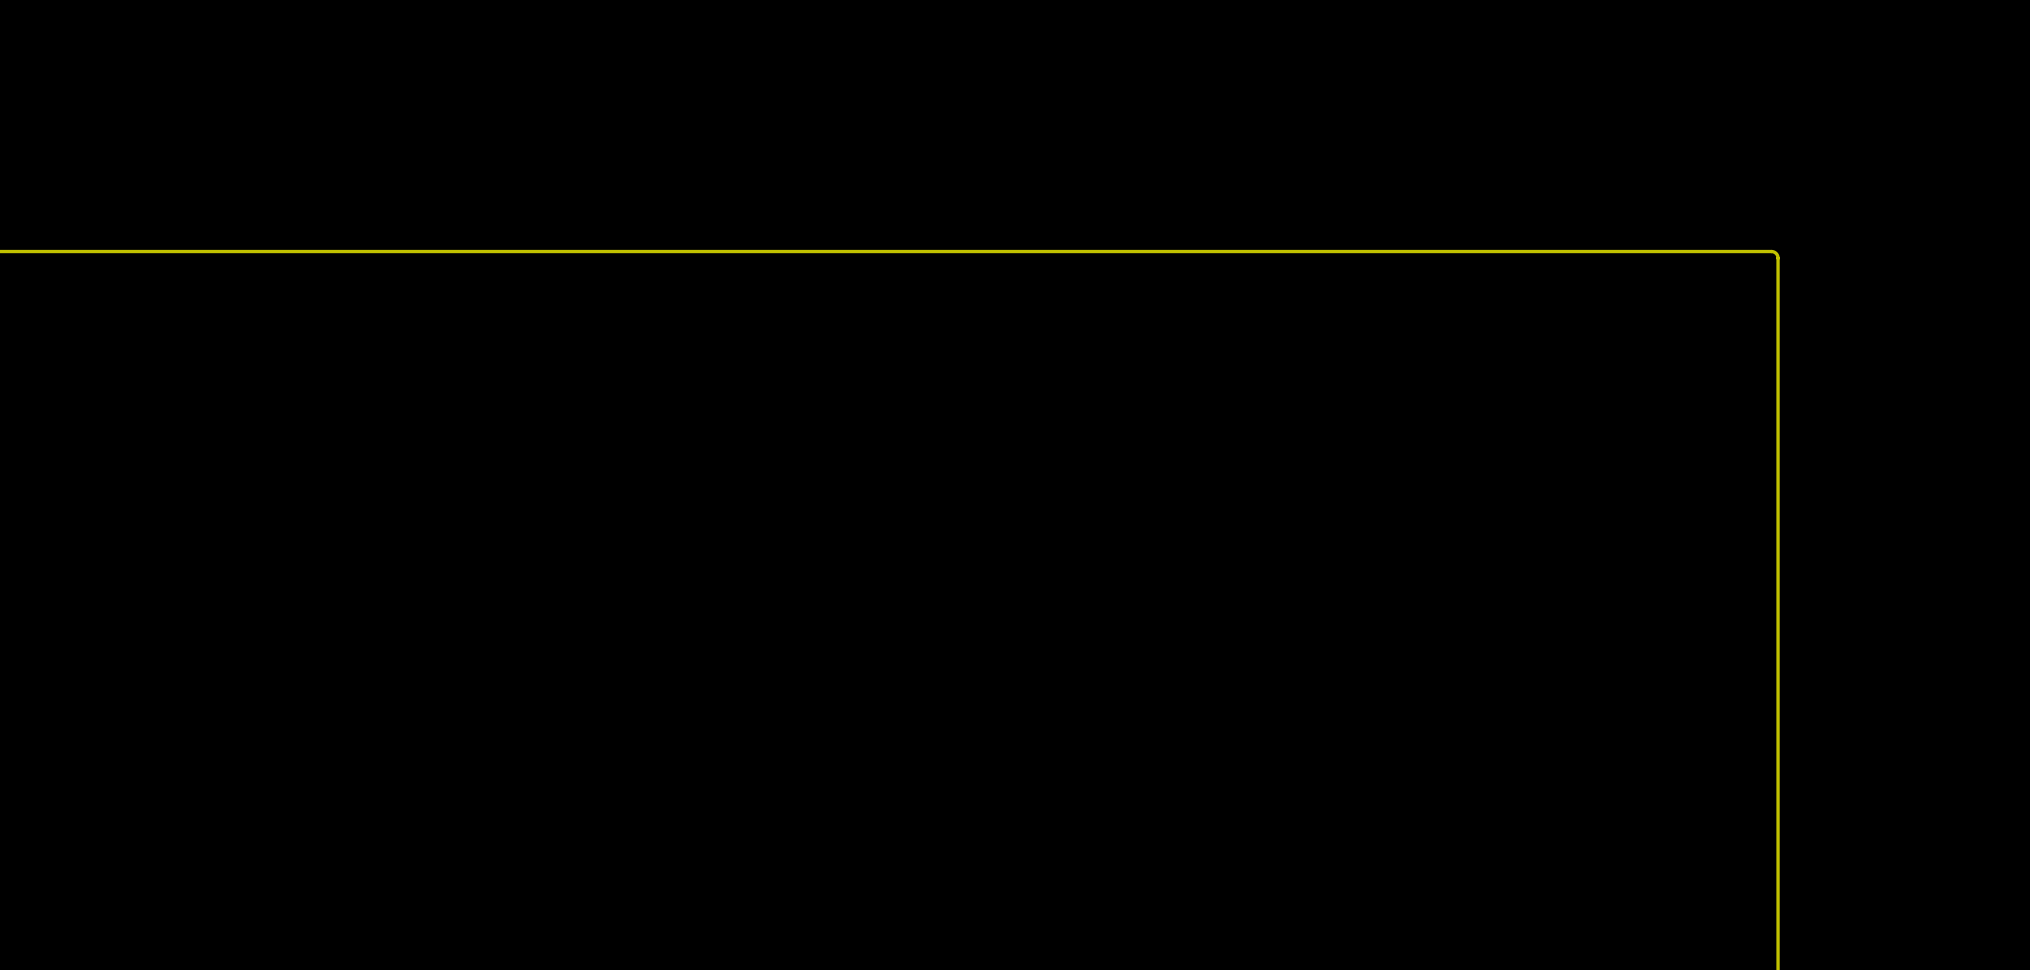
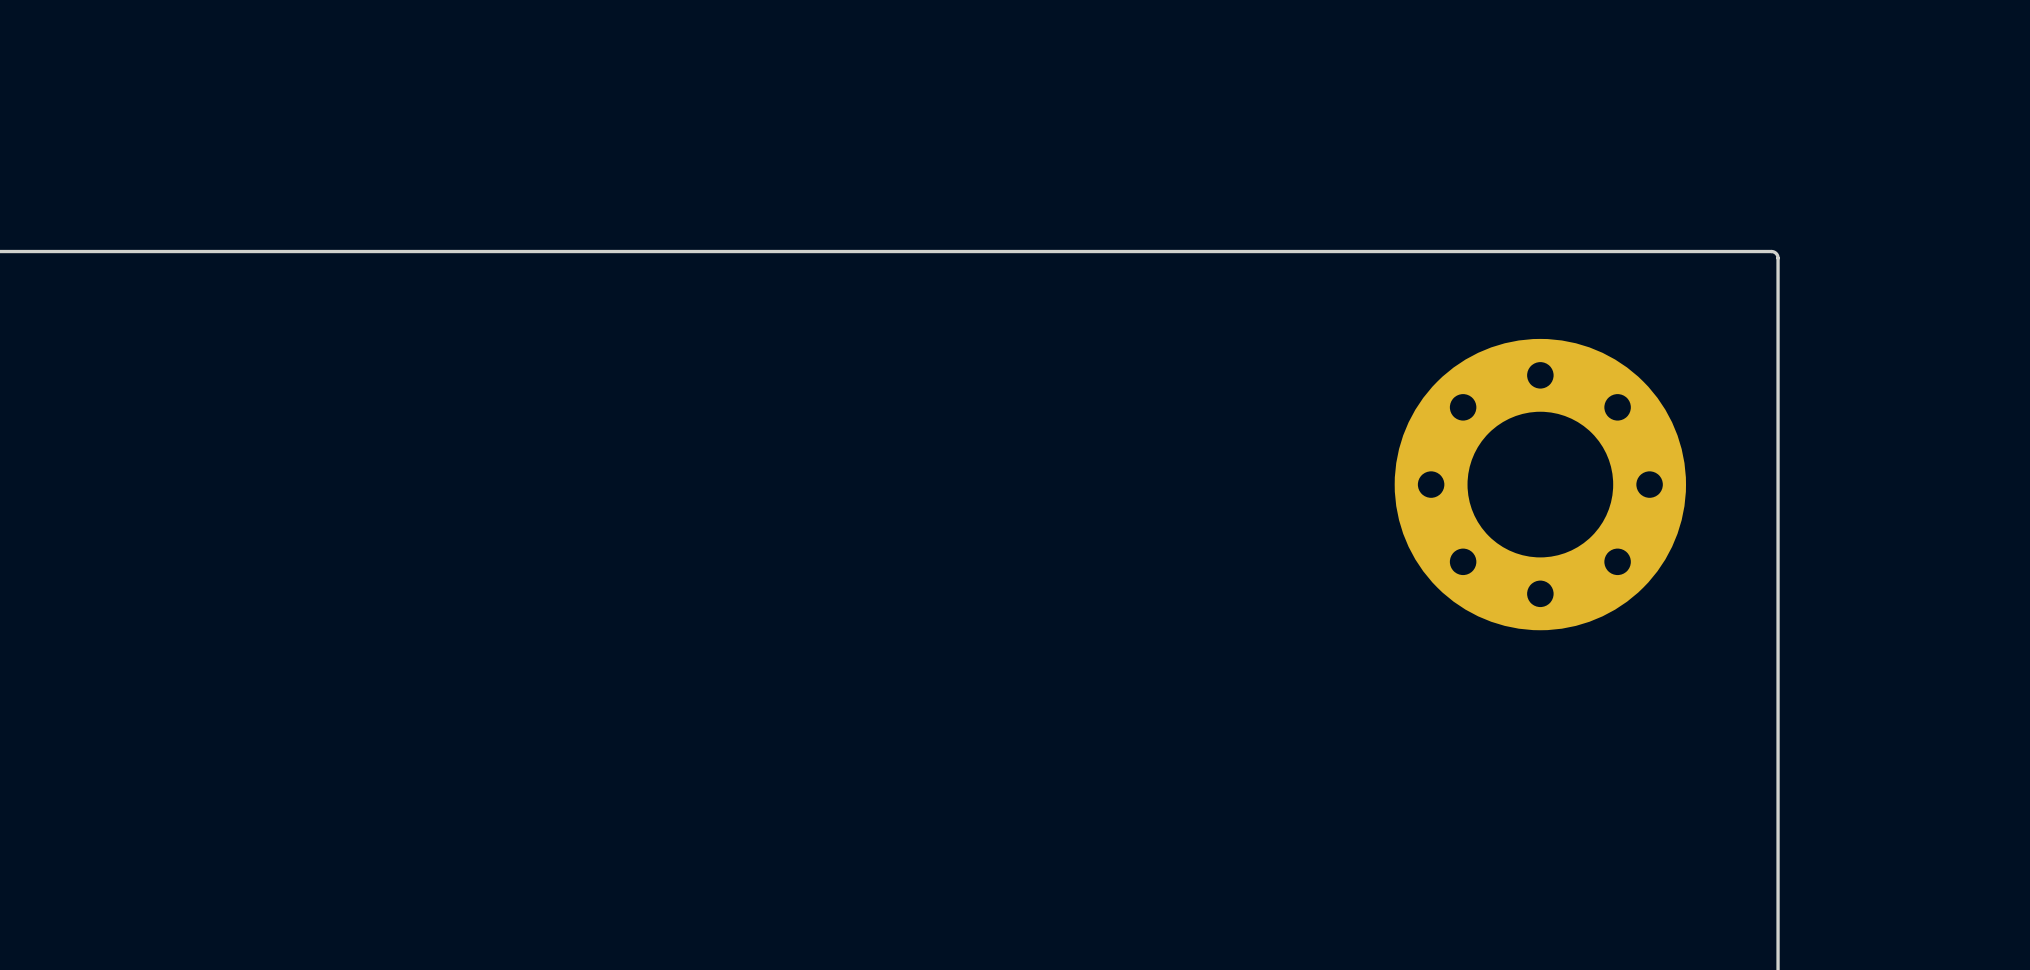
part: none -> (1540, 484)

